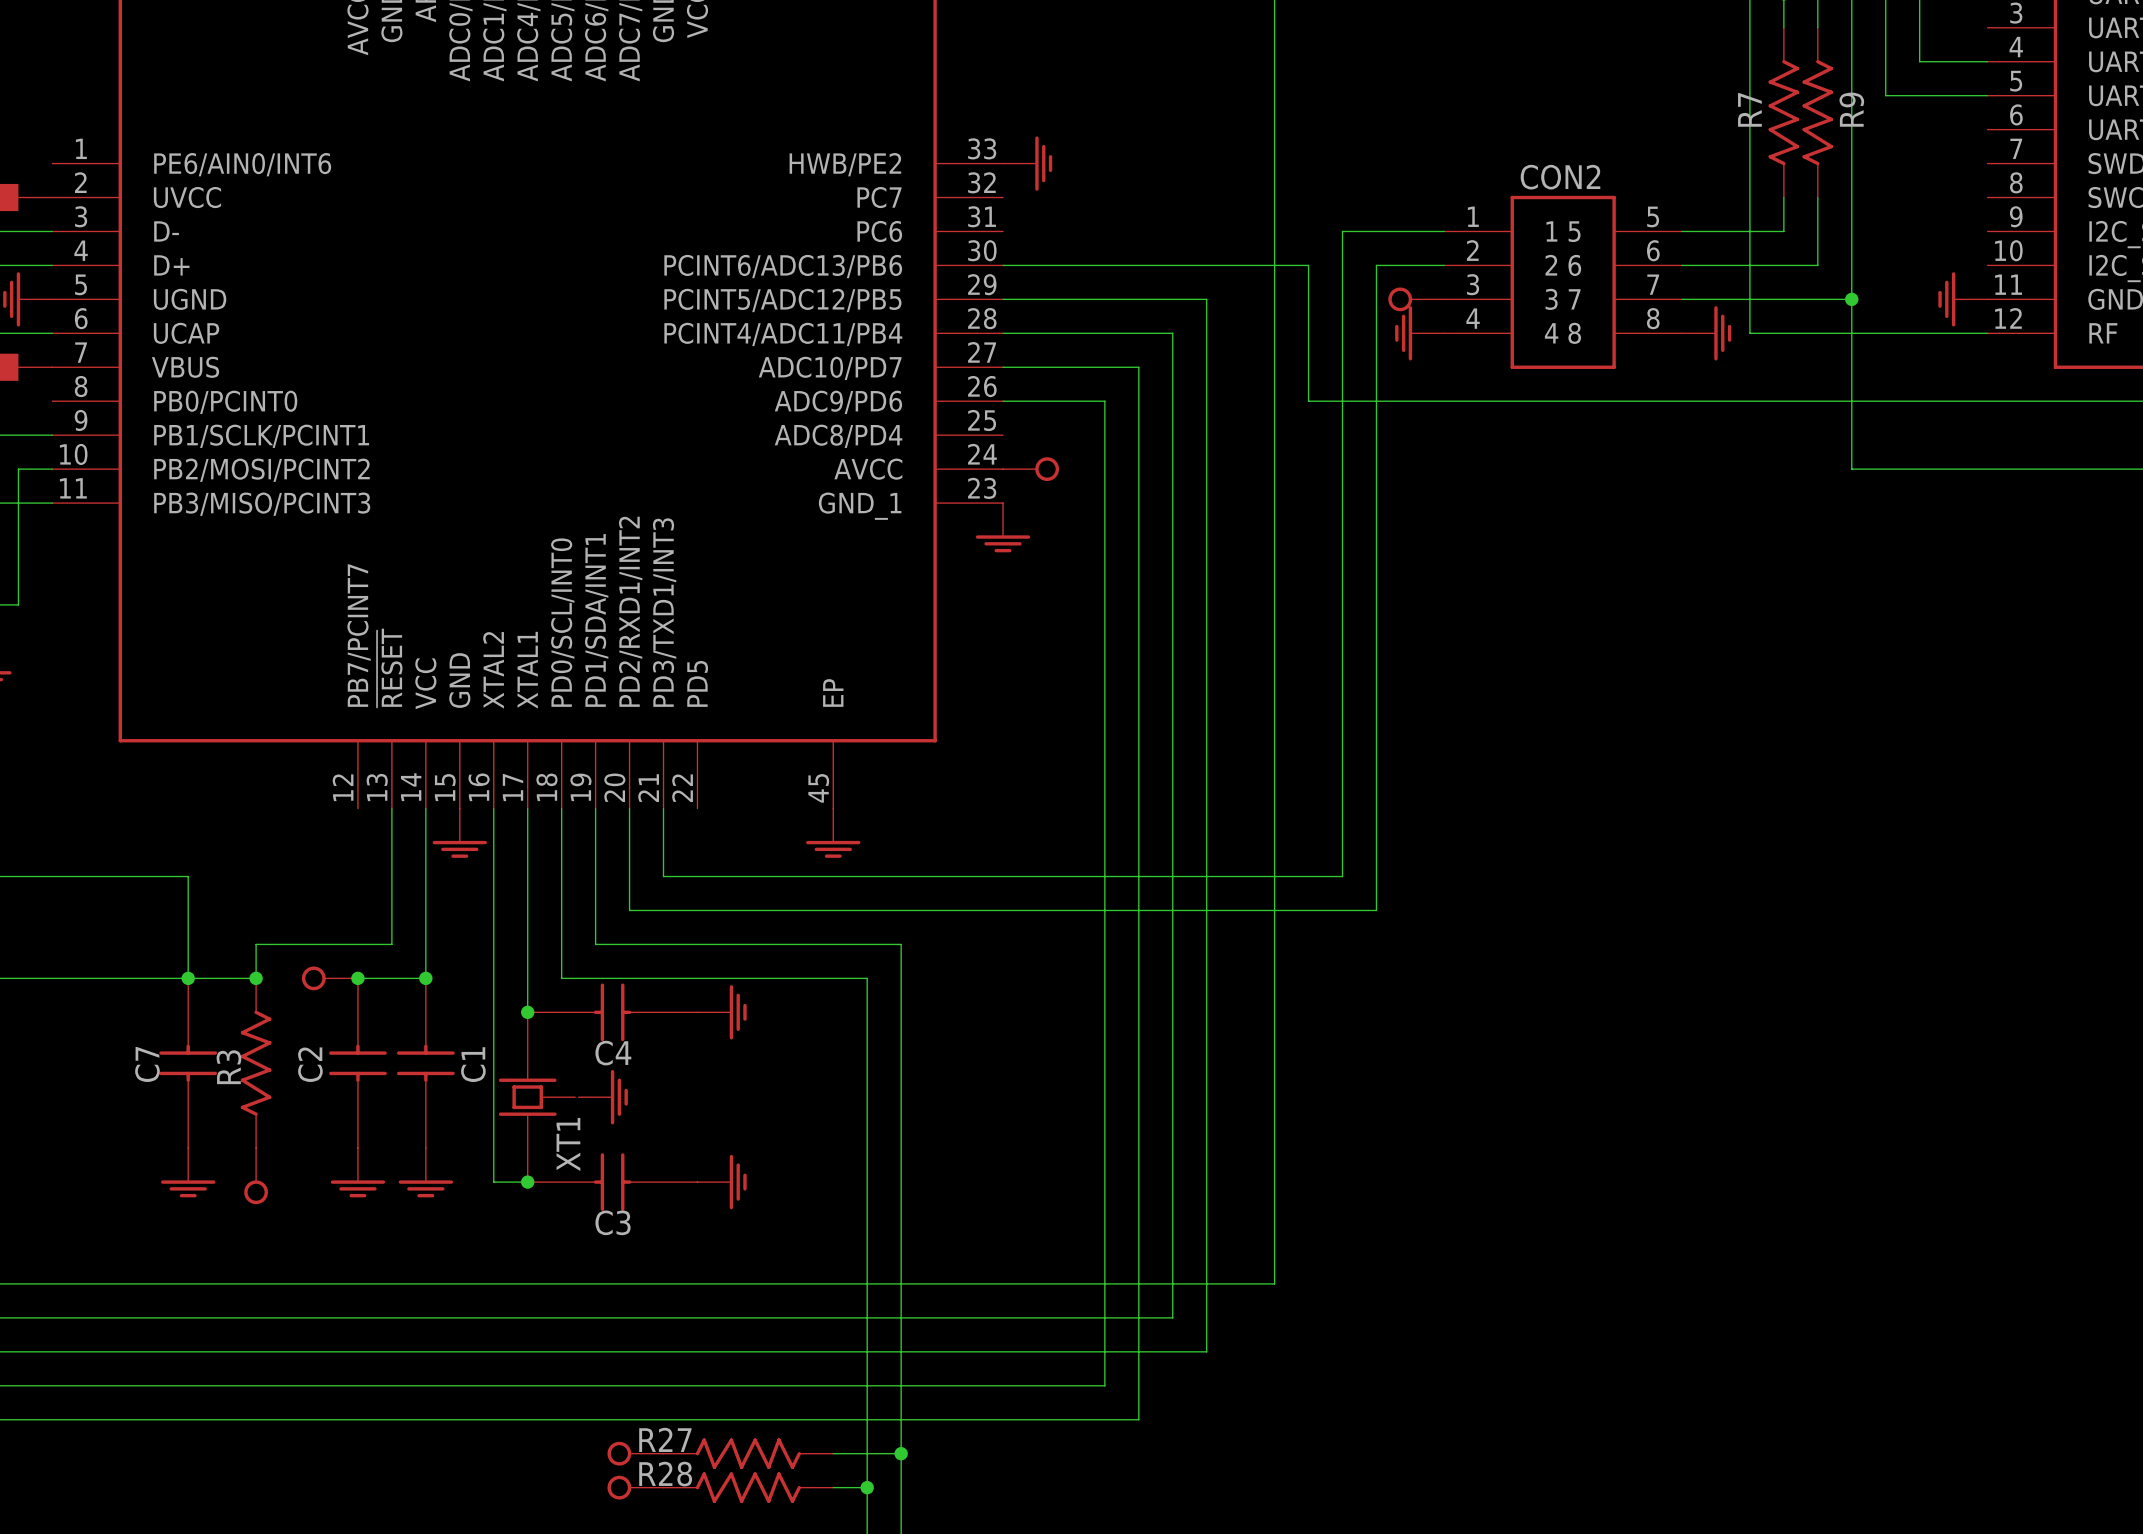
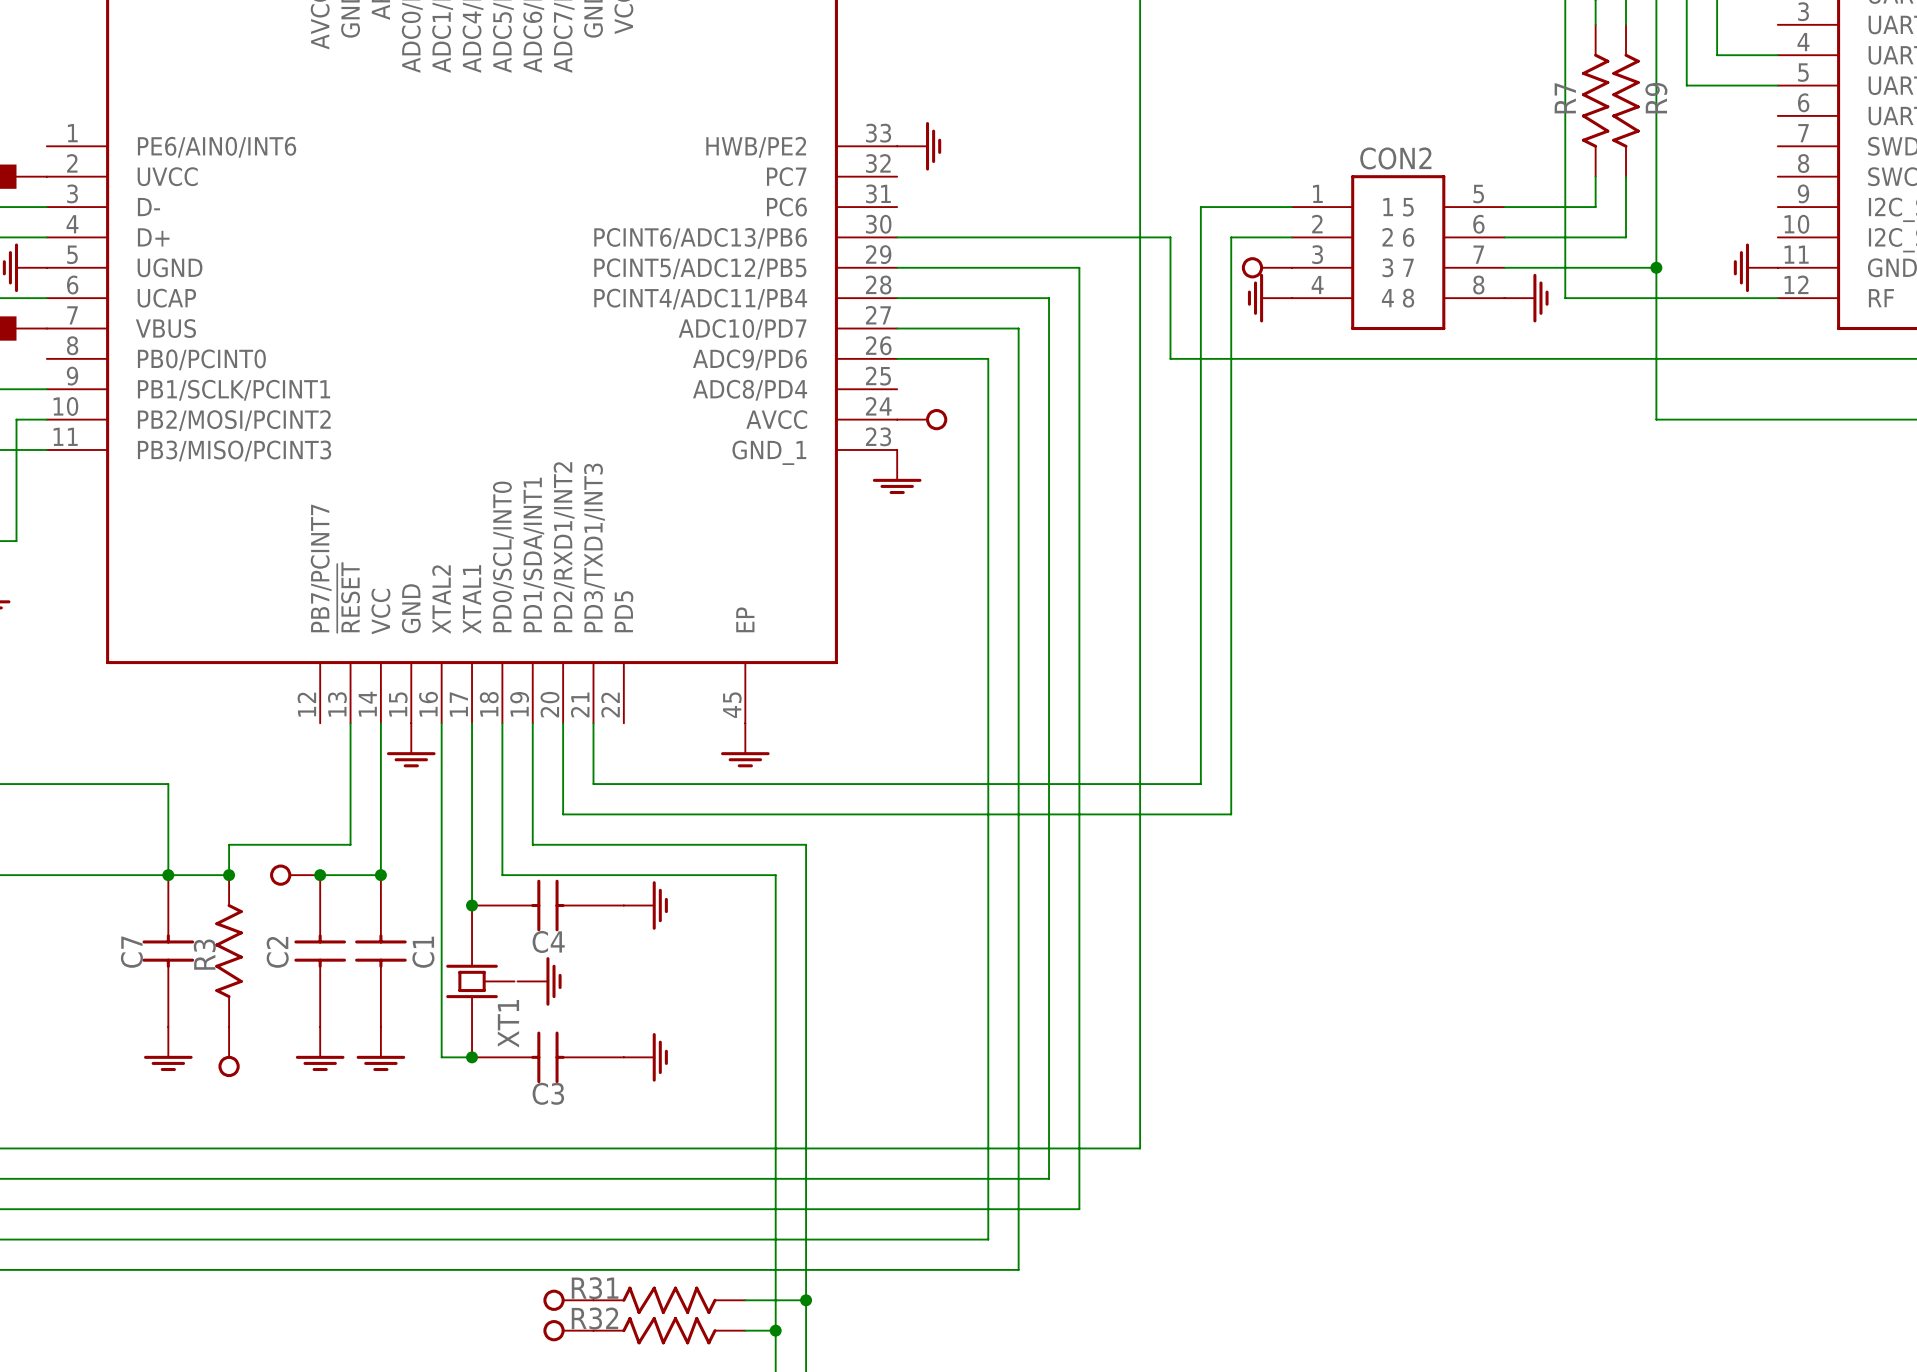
R27 name: R27 (665, 1439) -> R31 (595, 1288)
R28 name: R28 (665, 1474) -> R32 (594, 1318)

